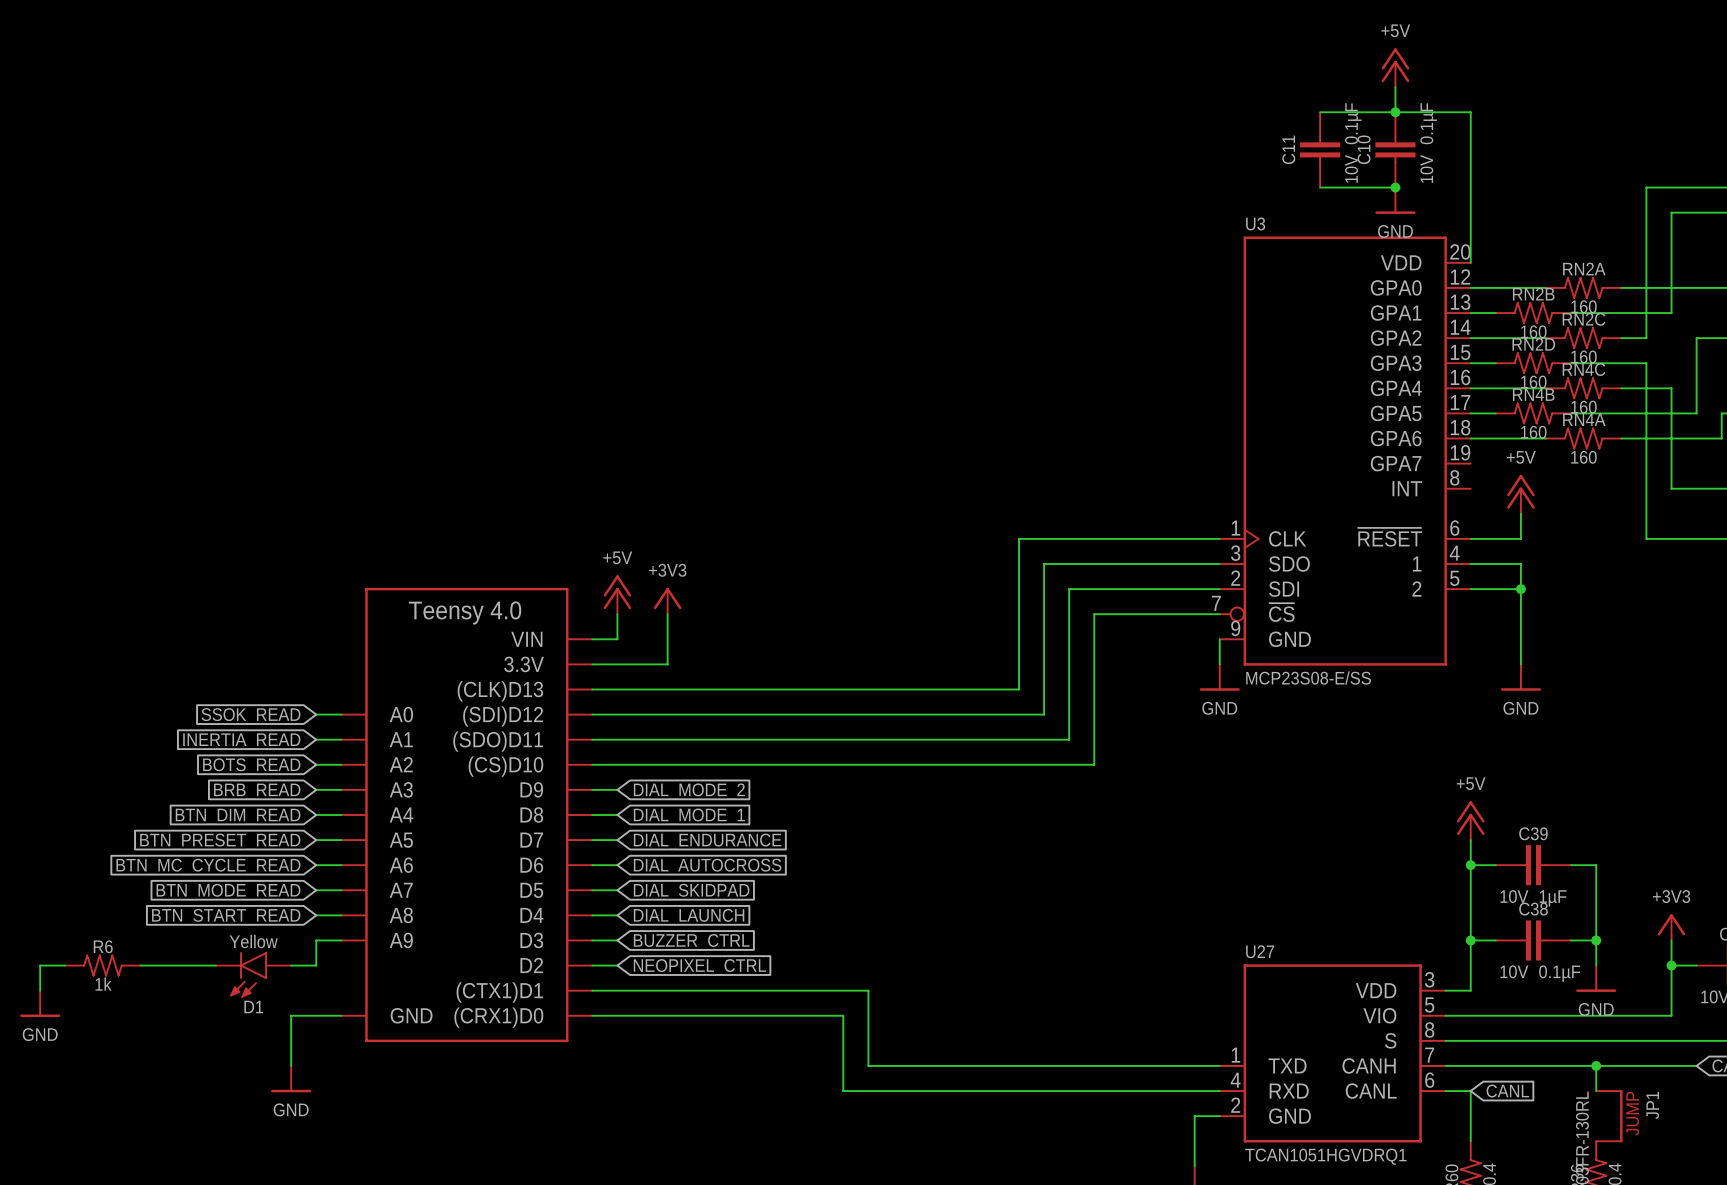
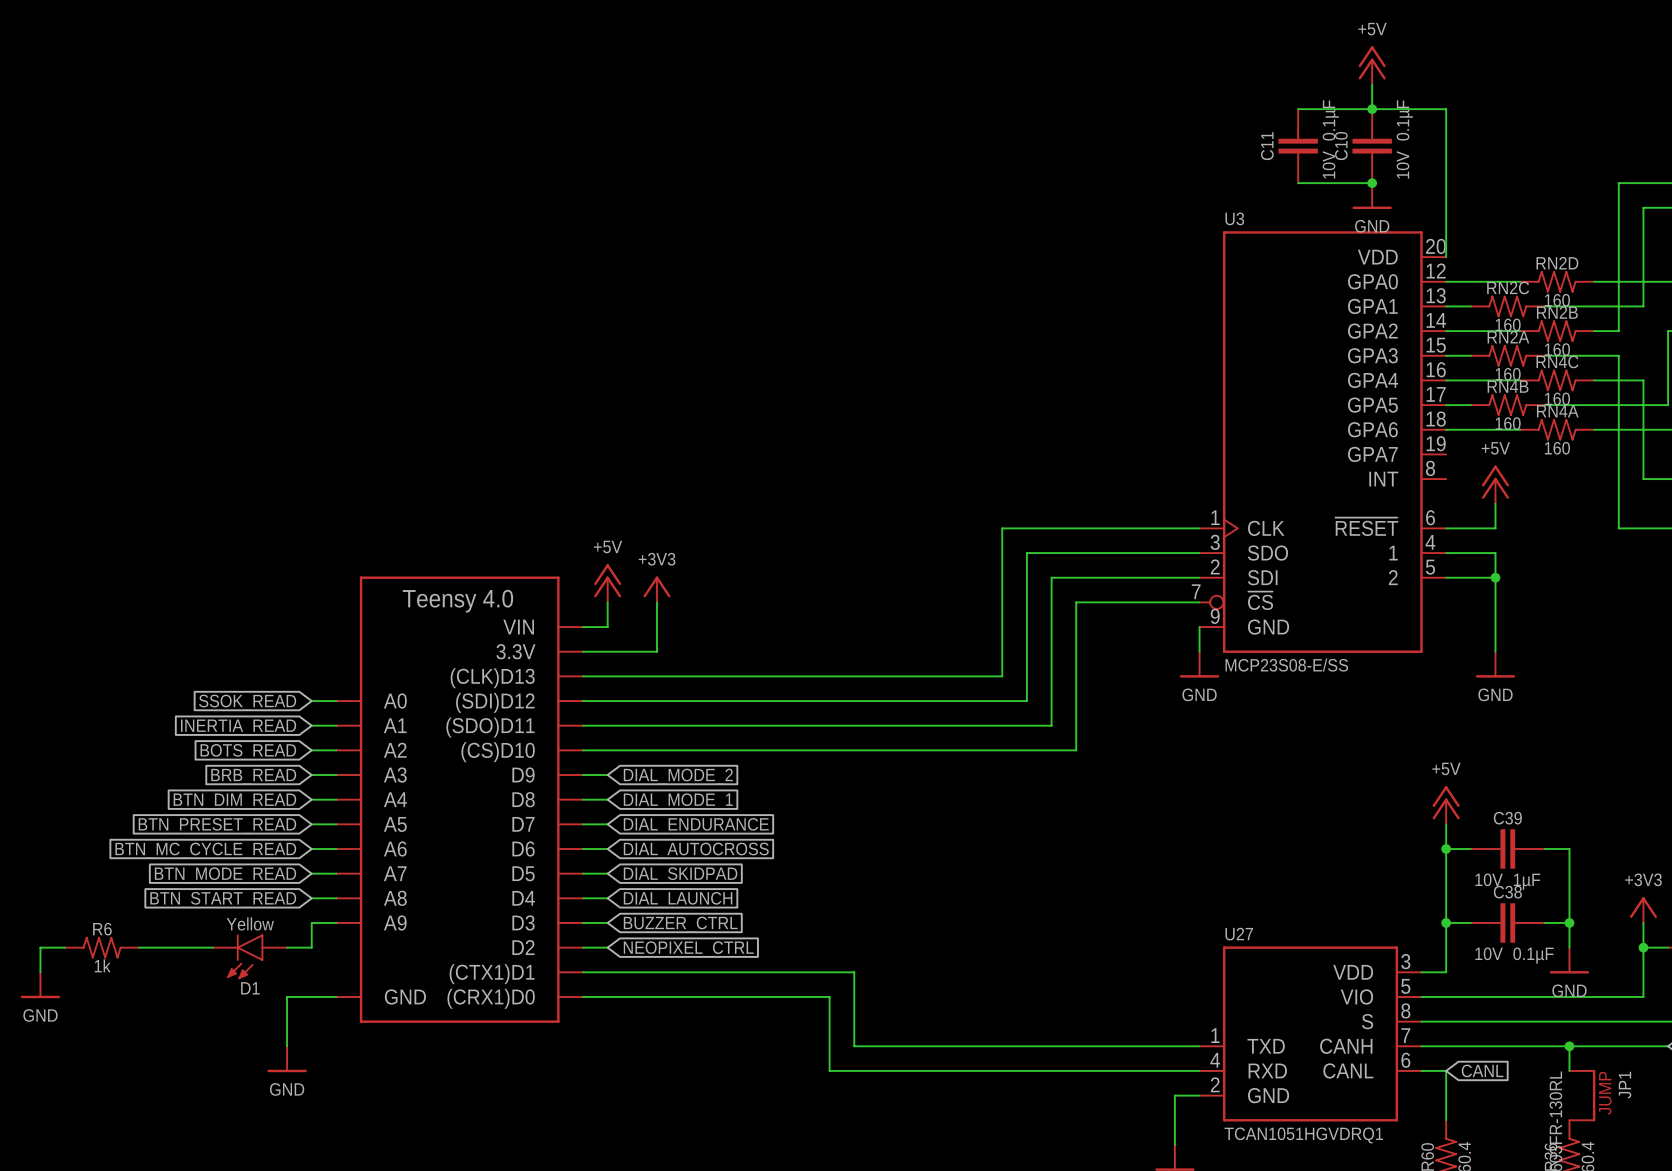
RN2A name: RN2A (1584, 269) -> RN2D (1557, 263)
RN2B name: RN2B (1533, 294) -> RN2C (1508, 287)
RN2C name: RN2C (1584, 319) -> RN2B (1557, 312)
RN2D name: RN2D (1533, 344) -> RN2A (1508, 337)

